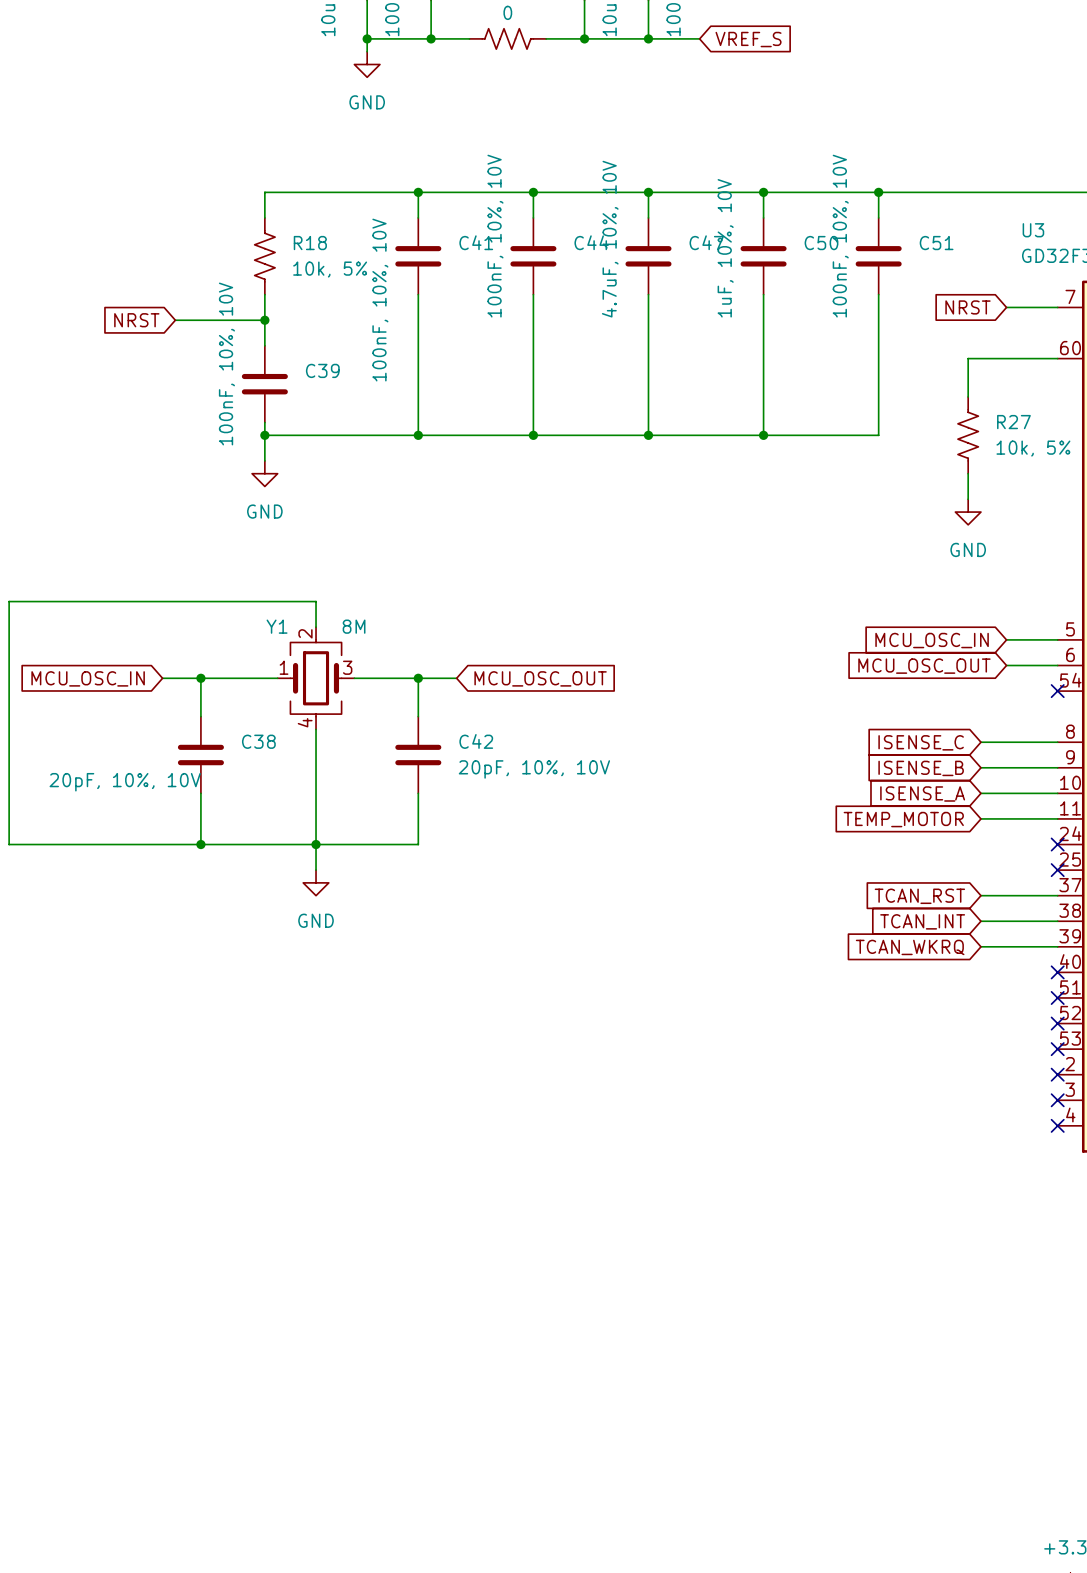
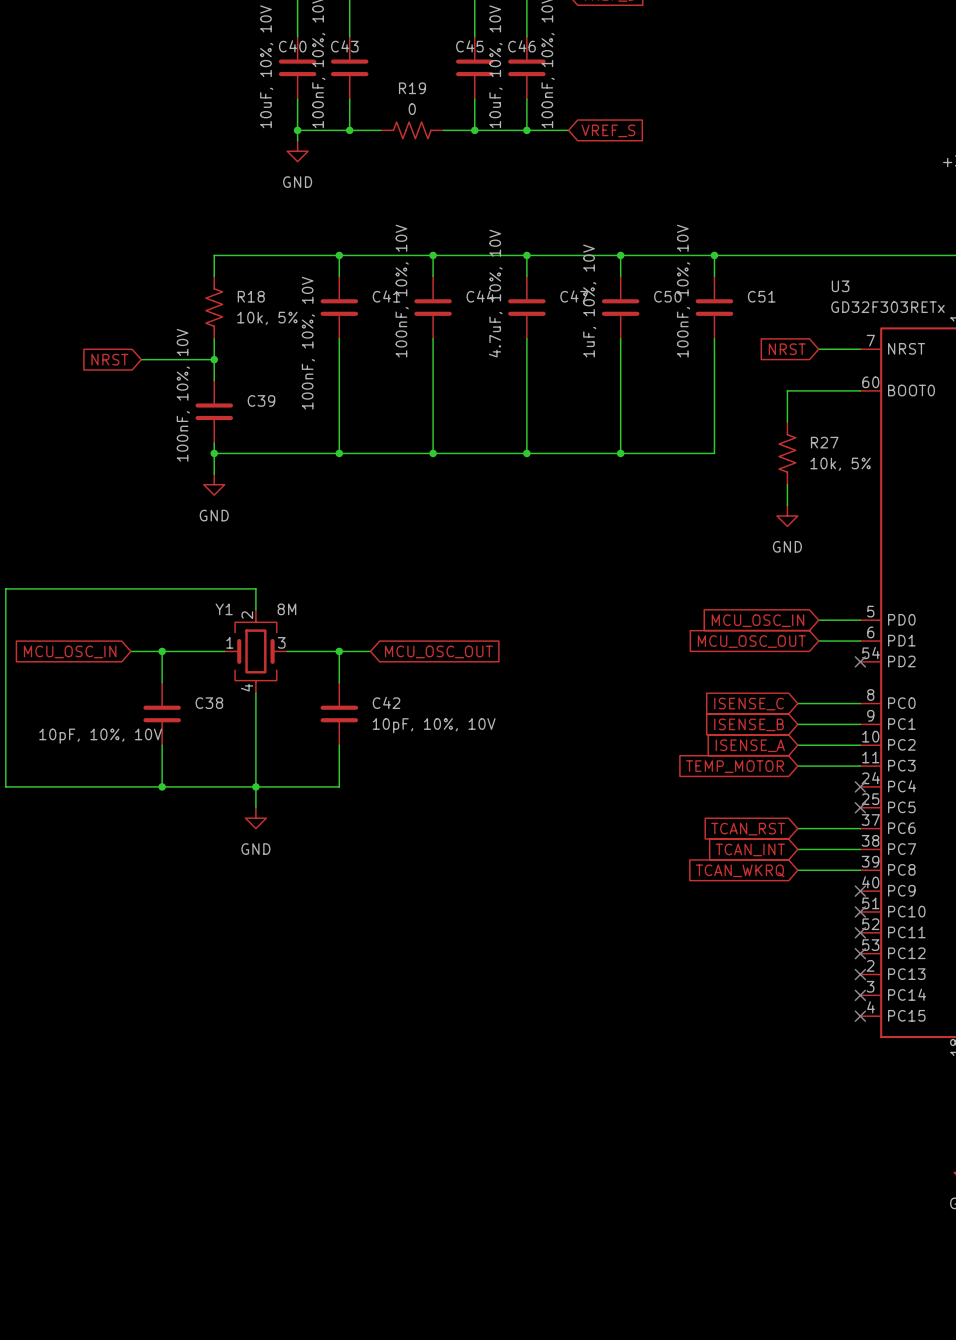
C42 value: 20pF, 10%, 10V (534, 769) -> 10pF, 10%, 10V (434, 725)
C38 value: 20pF, 10%, 10V (125, 782) -> 10pF, 10%, 10V (100, 736)

